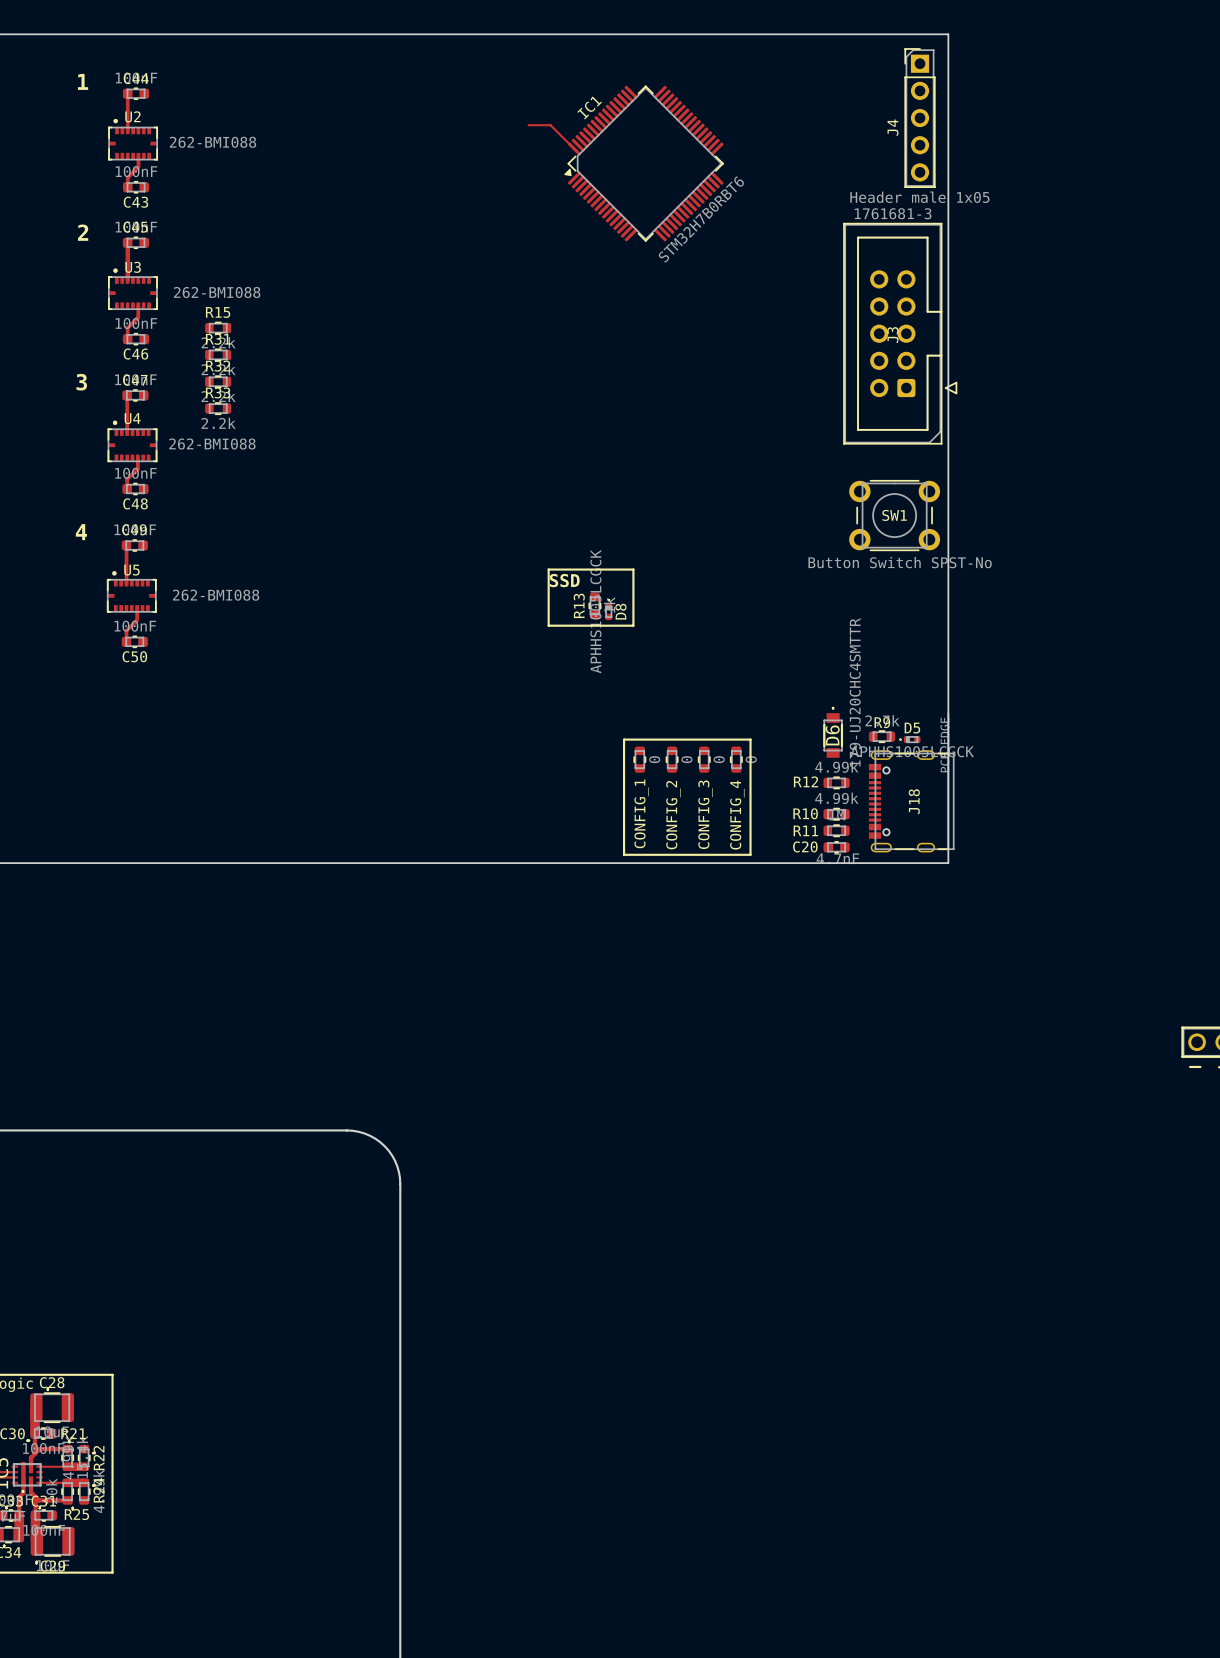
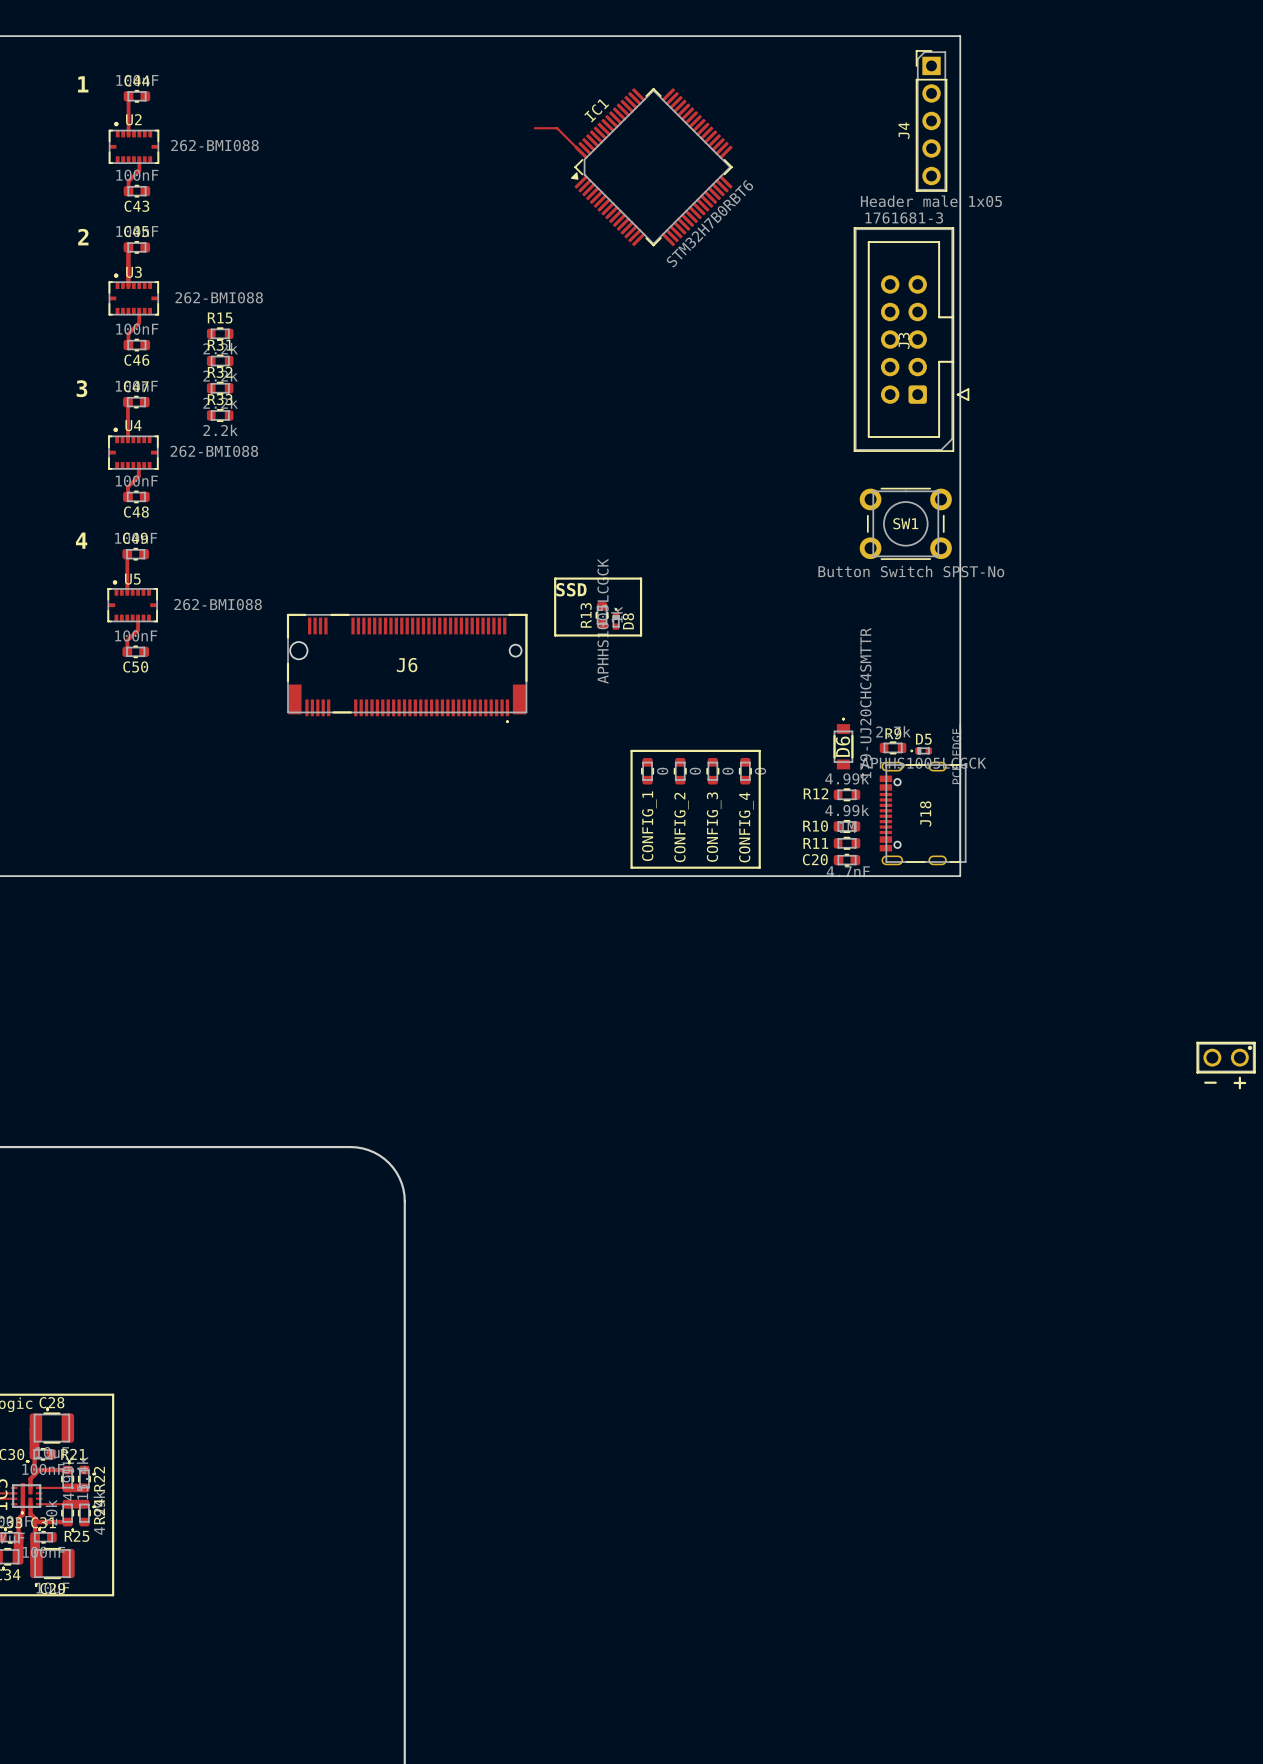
J6: none -> (407, 668)

